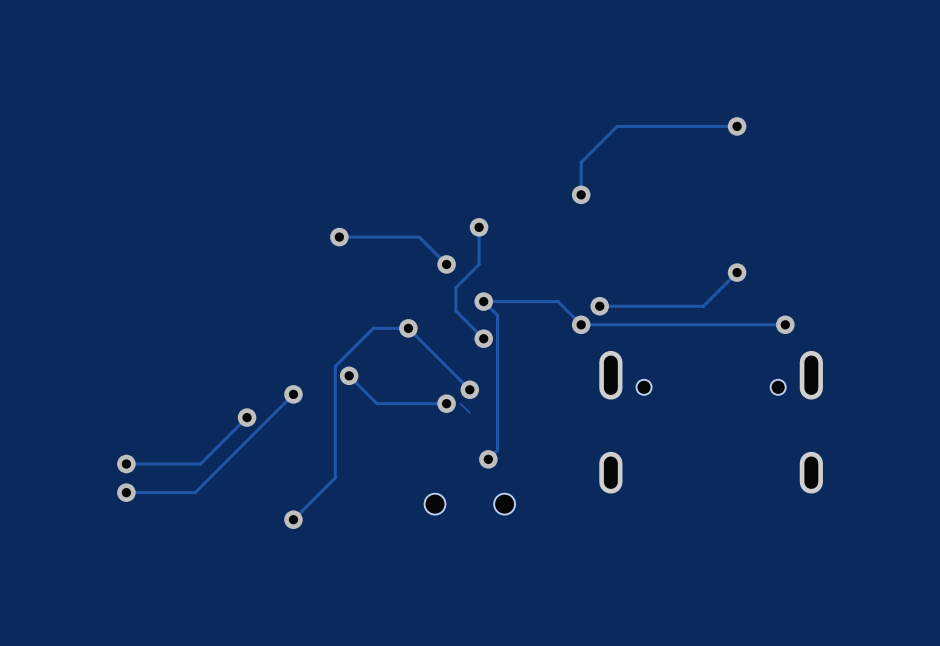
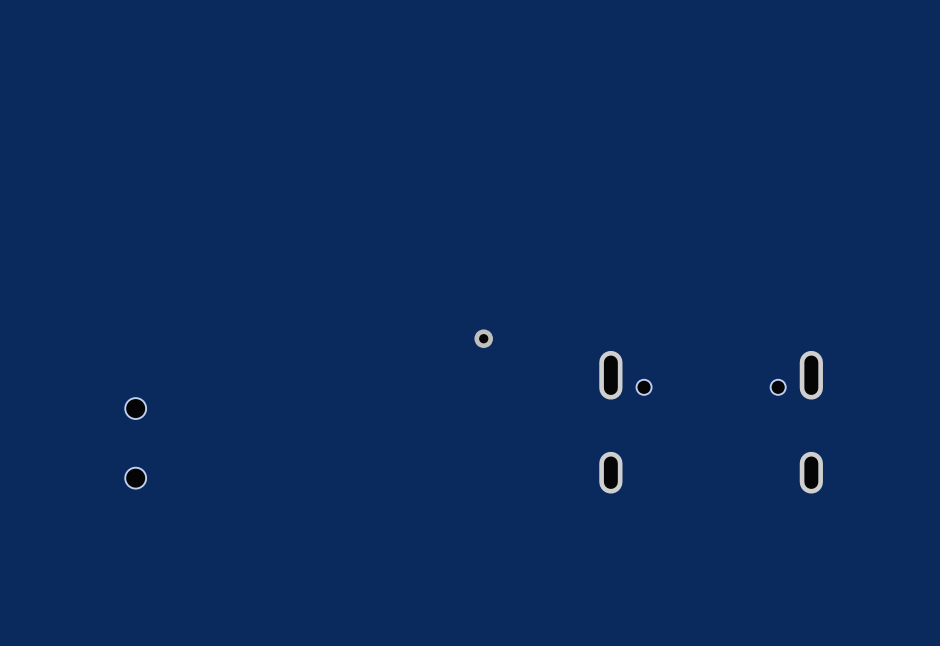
track: (737, 126) (617, 126) (581, 162) (581, 194) -> none
via: (737, 126) -> none
via: (581, 194) -> none
track: (479, 227) (479, 264) (455, 287) (455, 310) (483, 338) -> none
via: (479, 227) -> none
track: (339, 237) (419, 237) (446, 264) -> none
via: (339, 237) -> none
via: (446, 264) -> none
track: (737, 272) (703, 306) (599, 306) -> none
via: (737, 272) -> none
via: (483, 301) -> none
via: (599, 306) -> none
via: (581, 324) -> none
track: (785, 324) (581, 324) (557, 301) (483, 301) (497, 315) (497, 450) (488, 459) -> none
via: (785, 324) -> none
via: (408, 328) -> none
track: (349, 375) (376, 403) (446, 403) -> none
via: (349, 375) -> none
track: (469, 389) (408, 328) (373, 328) (335, 366) (335, 477) (293, 519) -> none
via: (469, 389) -> none
track: (293, 394) (195, 492) (126, 492) -> none
via: (293, 394) -> none
via: (446, 403) -> none
track: (460, 403) (469, 412) -> none
track: (247, 417) (200, 464) (126, 464) -> none
via: (247, 417) -> none
via: (488, 459) -> none
via: (126, 464) -> none
via: (126, 492) -> none
part rotation: 0° (469, 504) -> 90° clockwise (135, 443)
part position: (469, 504) -> (135, 443)
via: (293, 519) -> none

